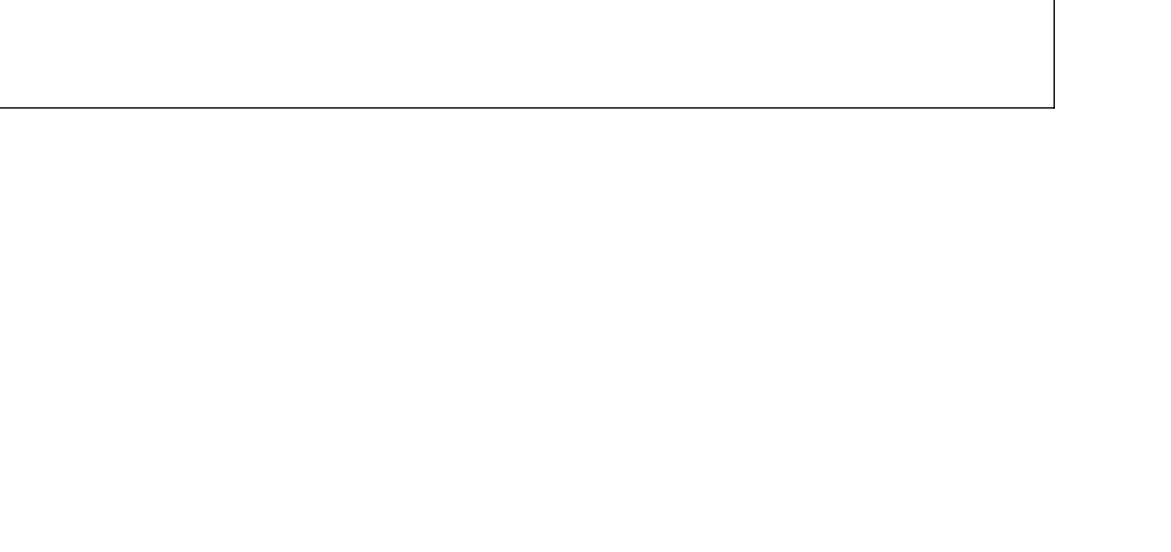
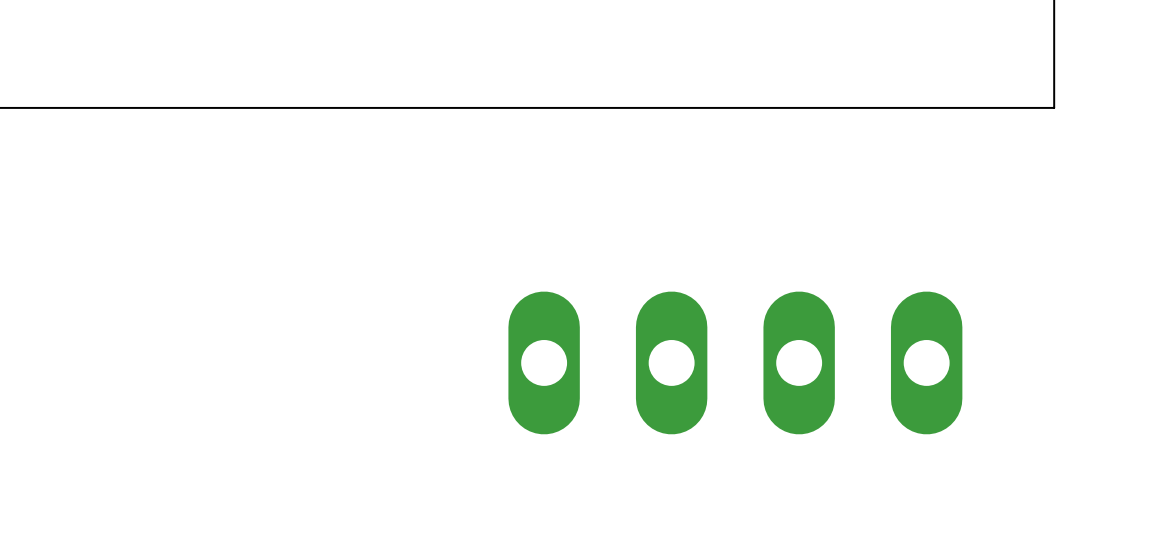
part: none -> (735, 362)

